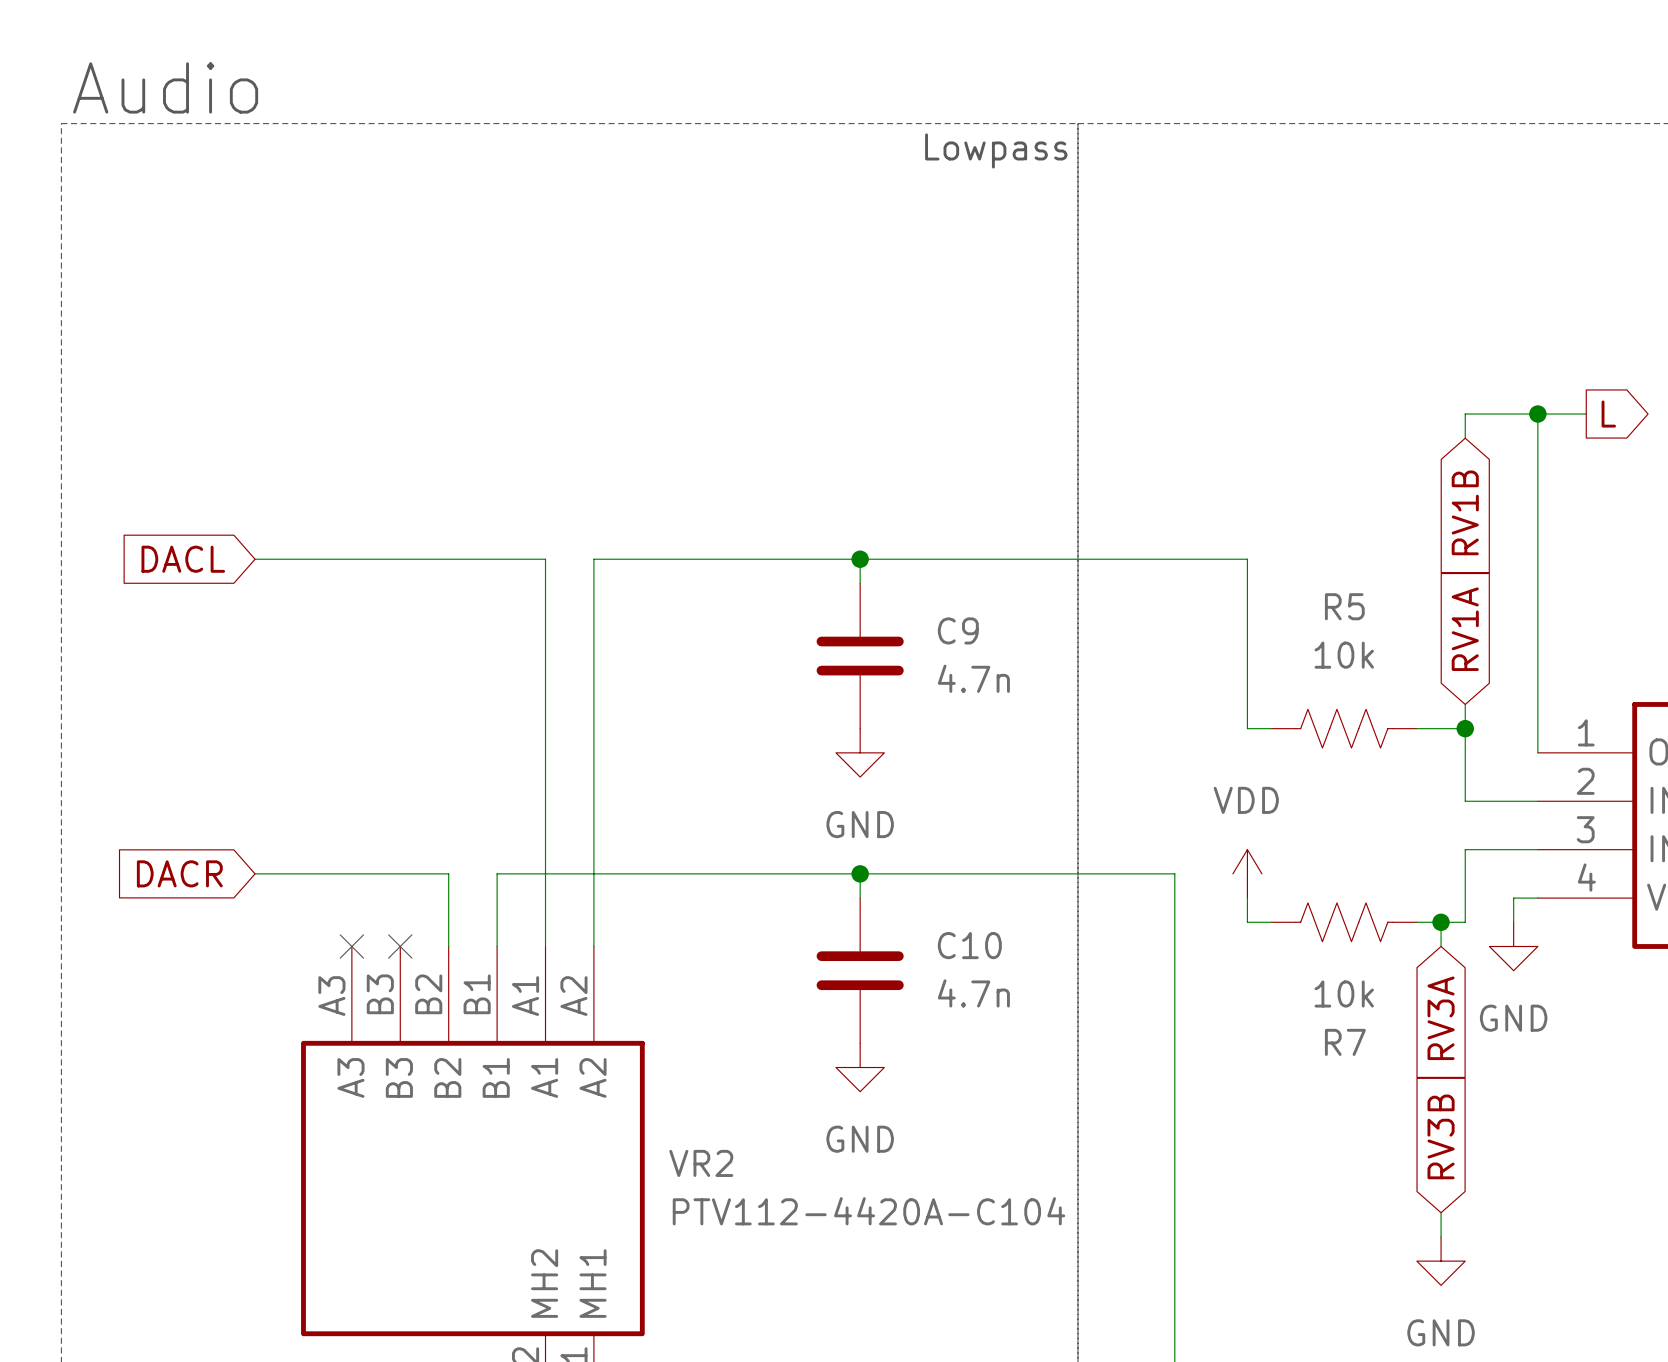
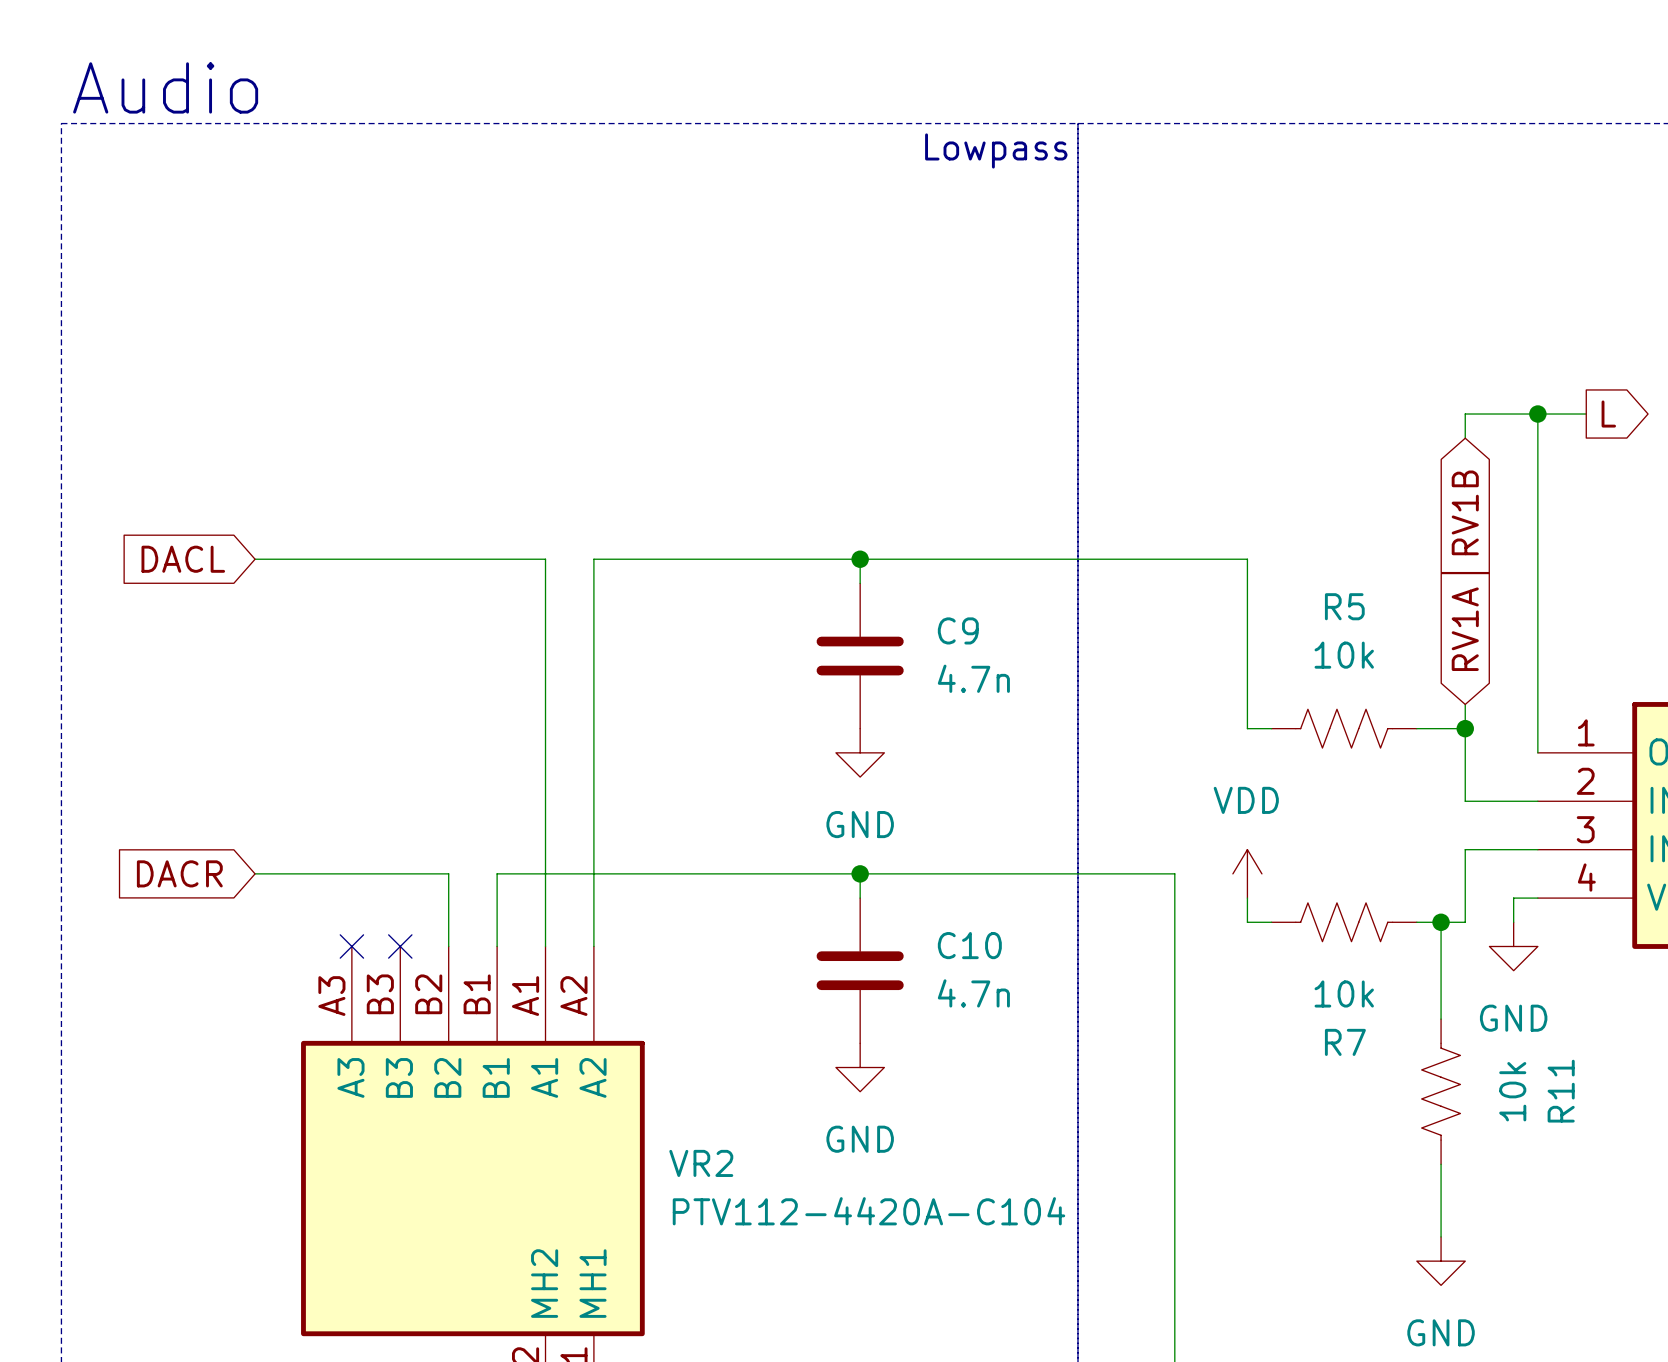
wire: none -> (1441, 946) (1441, 1019)
global label: RV3A (1441, 1018) -> none
R11: none -> 10k (1441, 1091)
global label: RV3B (1441, 1136) -> none
wire: none -> (1441, 1164) (1441, 1212)

